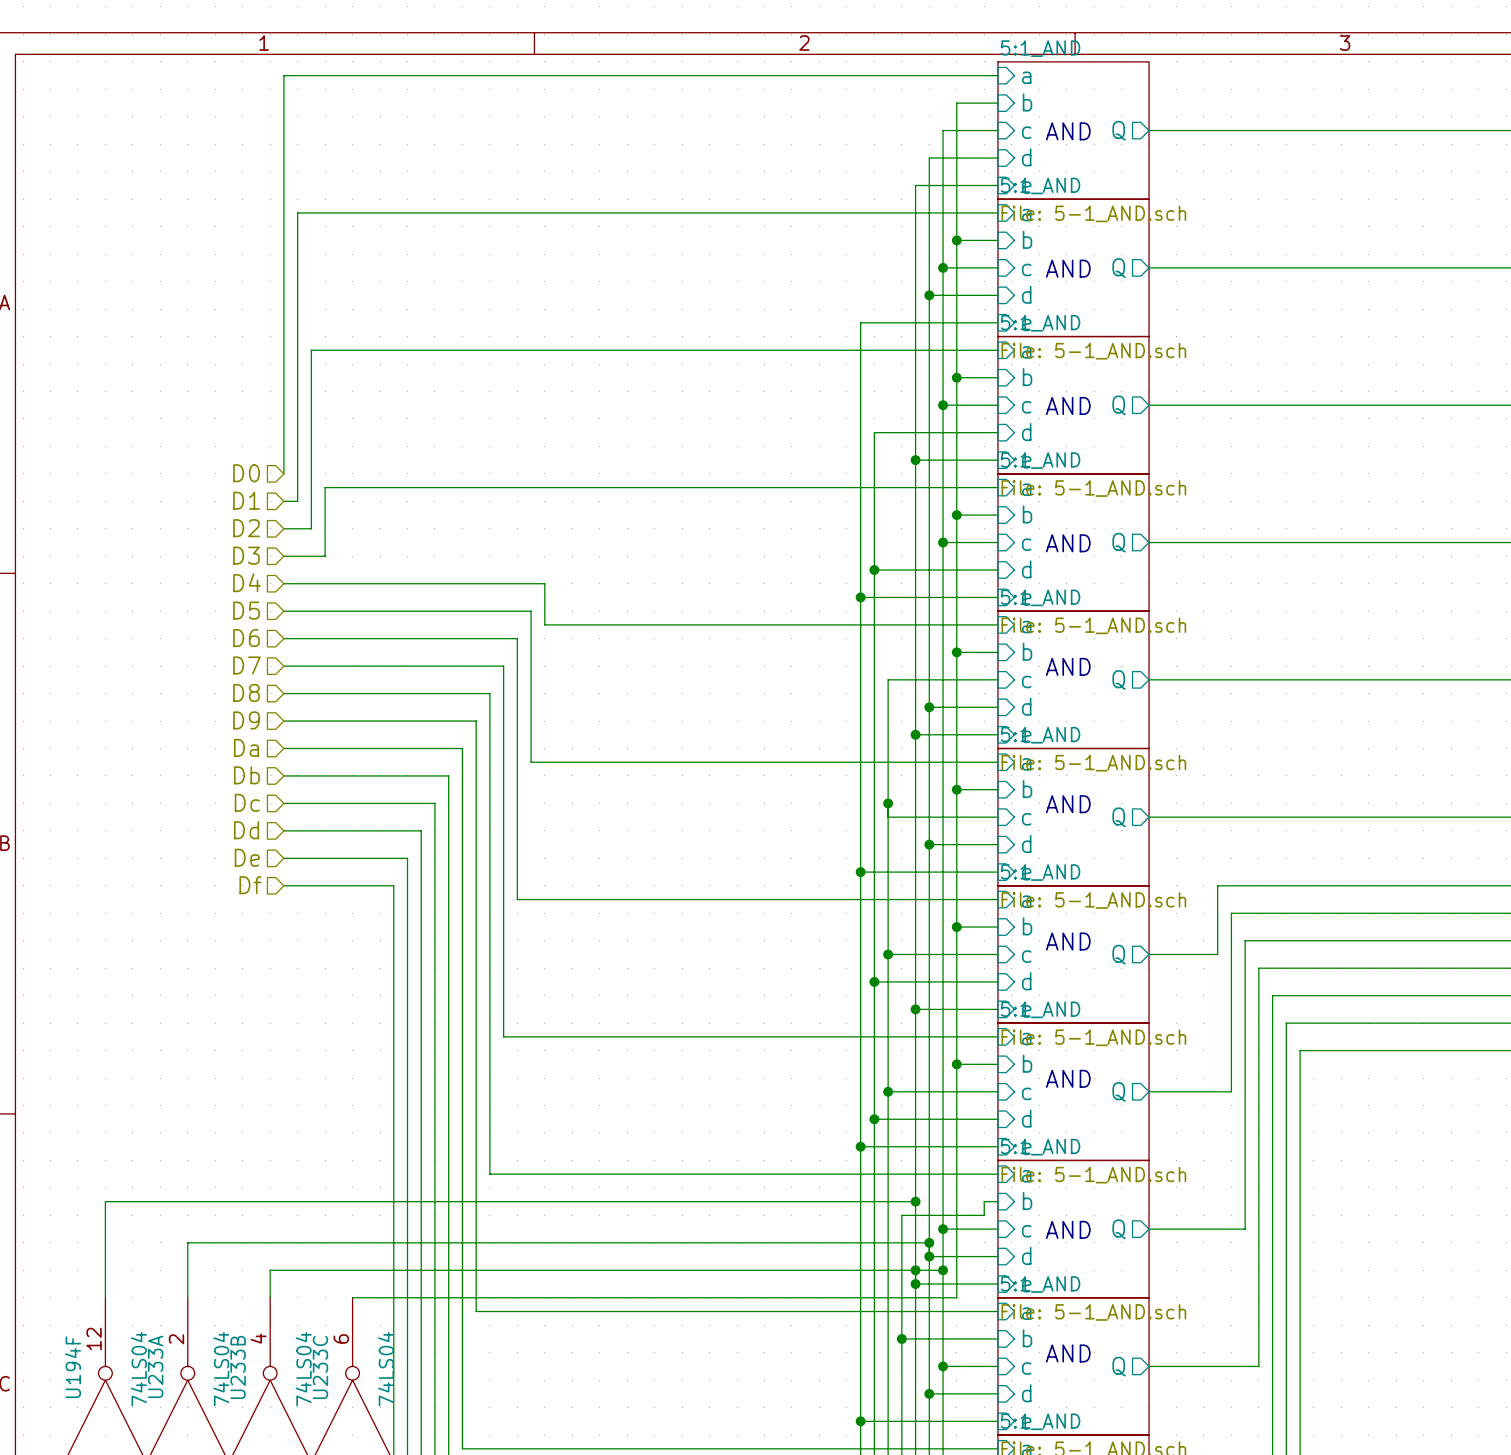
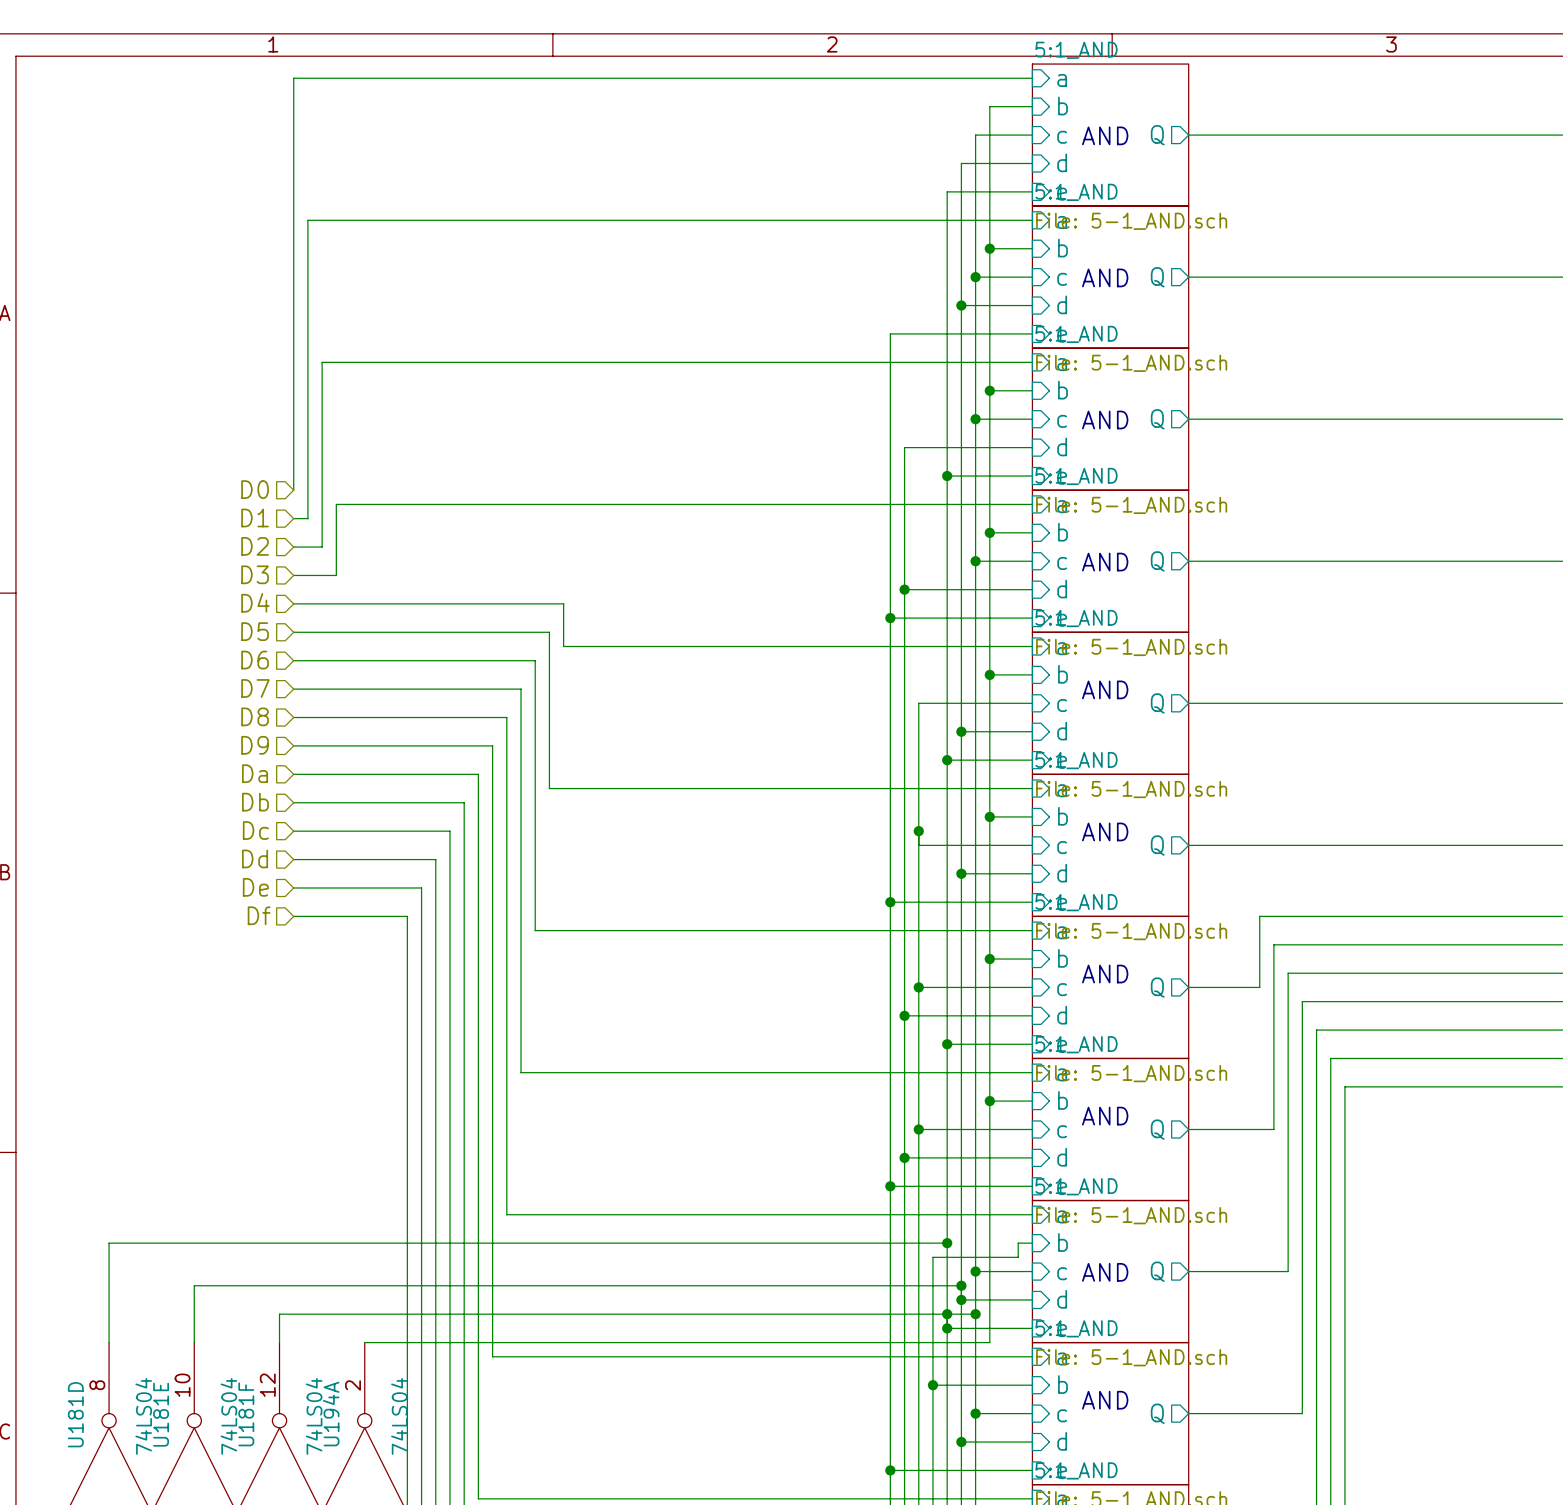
U194F pin number: 12 (94, 1338) -> 8 (97, 1385)
U233B pin number: 4 (258, 1338) -> 12 (267, 1385)
U233C pin number: 6 (341, 1338) -> 2 (353, 1385)
U233A pin number: 2 (176, 1339) -> 10 (182, 1385)
U233A name: U233A (155, 1366) -> U181E (161, 1414)
U194F name: U194F (72, 1367) -> U181D (75, 1414)
U233B name: U233B (238, 1367) -> U181F (246, 1414)
U233C name: U233C (320, 1367) -> U194A (331, 1414)

